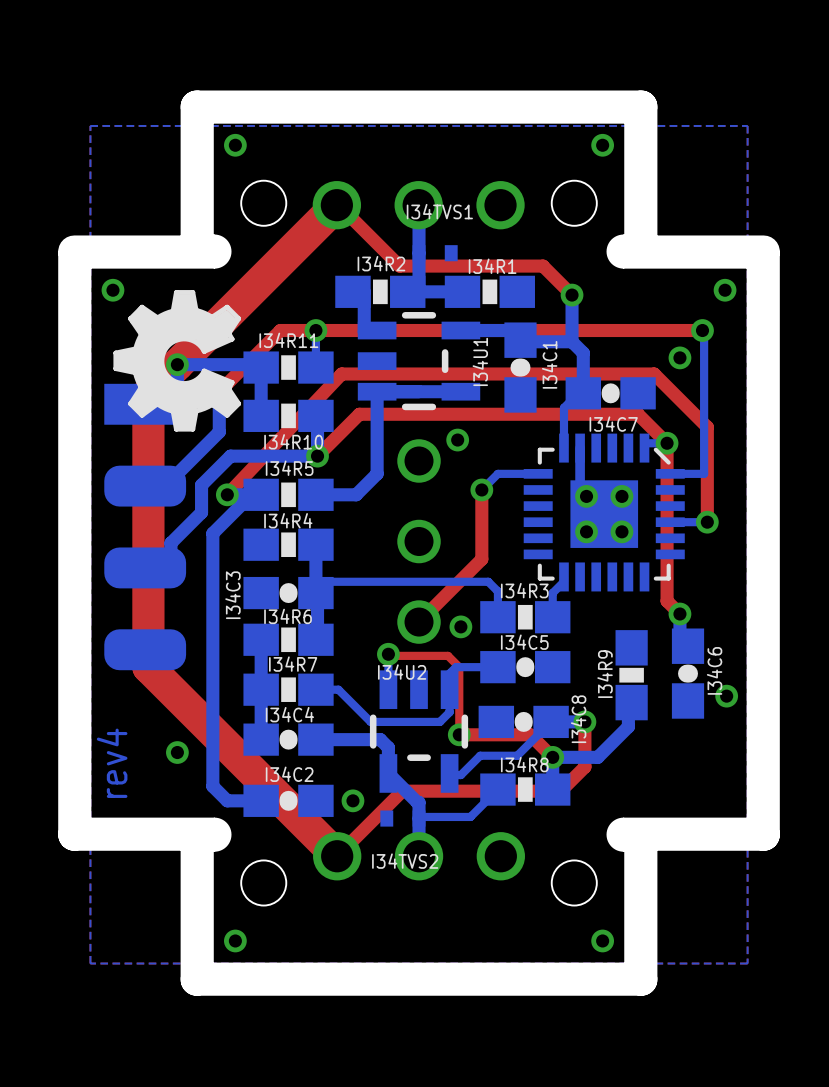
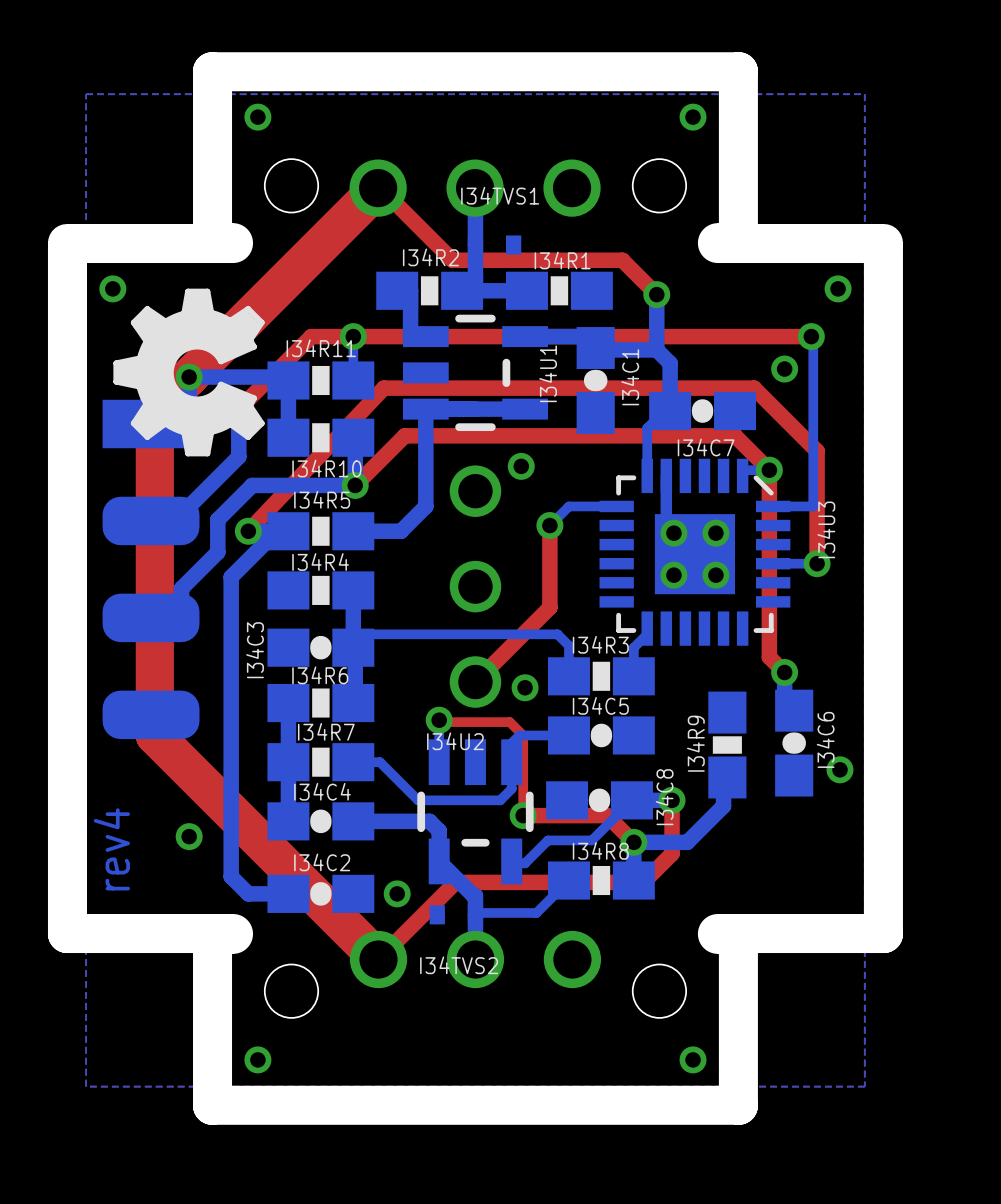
I34U3 name: none -> I34U3 (826, 529)

